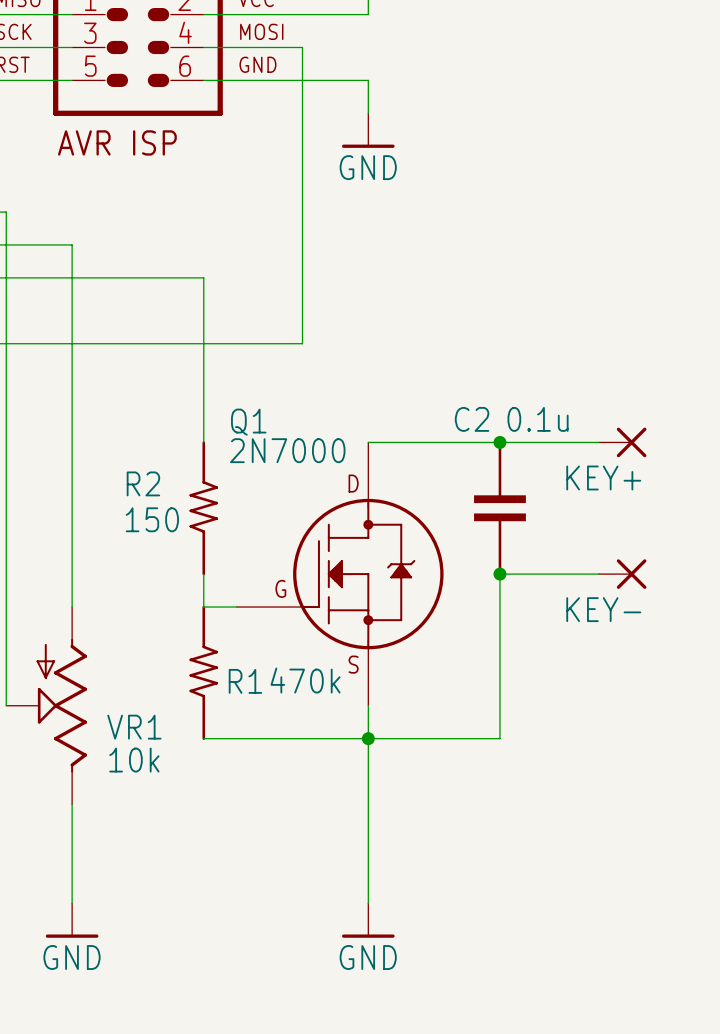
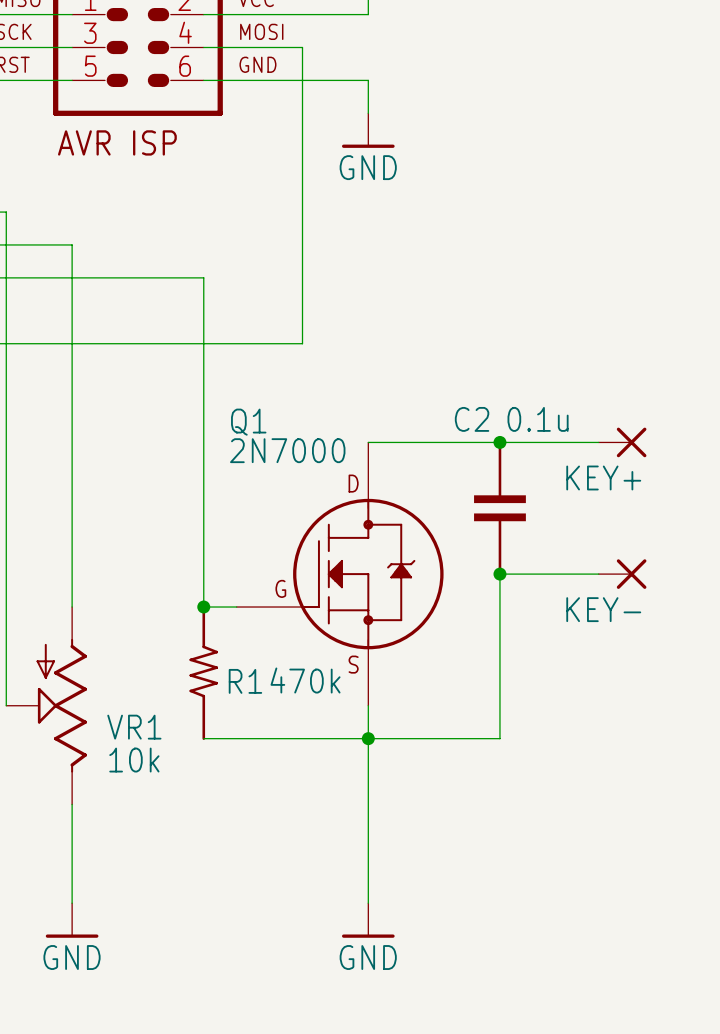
R2: 150 (203, 508) -> none
junction: none -> (203, 607)

